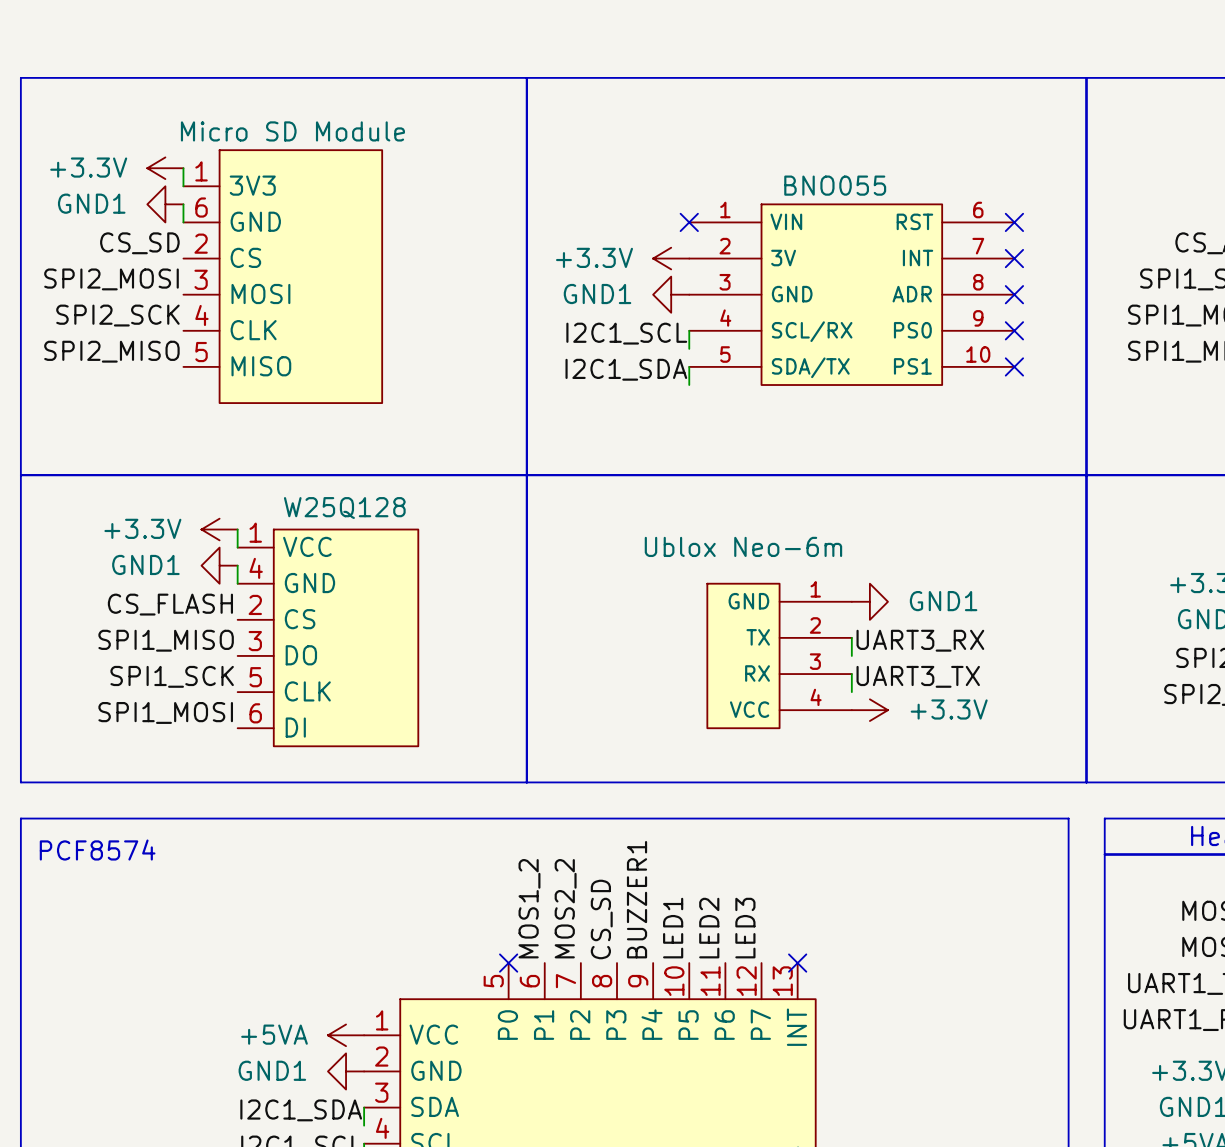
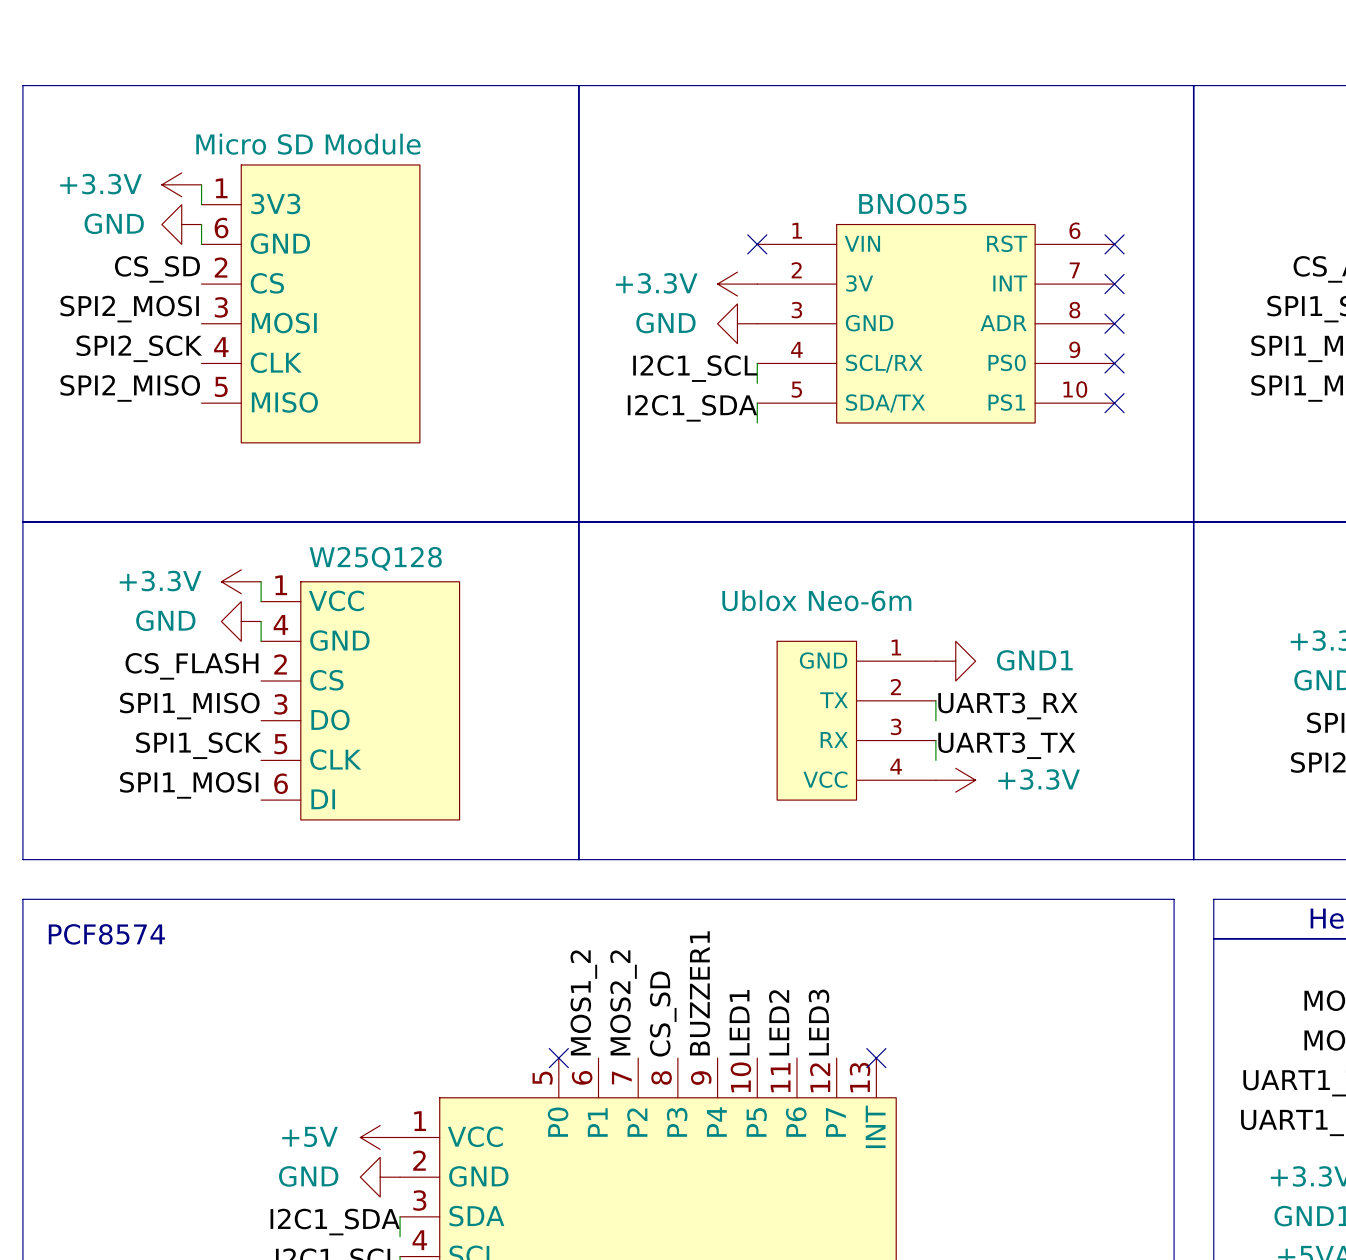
power symbol: GND1 (165, 204) -> GND (181, 224)
power symbol: GND1 (671, 294) -> GND (737, 323)
power symbol: GND1 (219, 565) -> GND (241, 621)
power symbol: +5VA (346, 1035) -> +5V (380, 1137)
power symbol: GND1 (346, 1071) -> GND (380, 1177)

